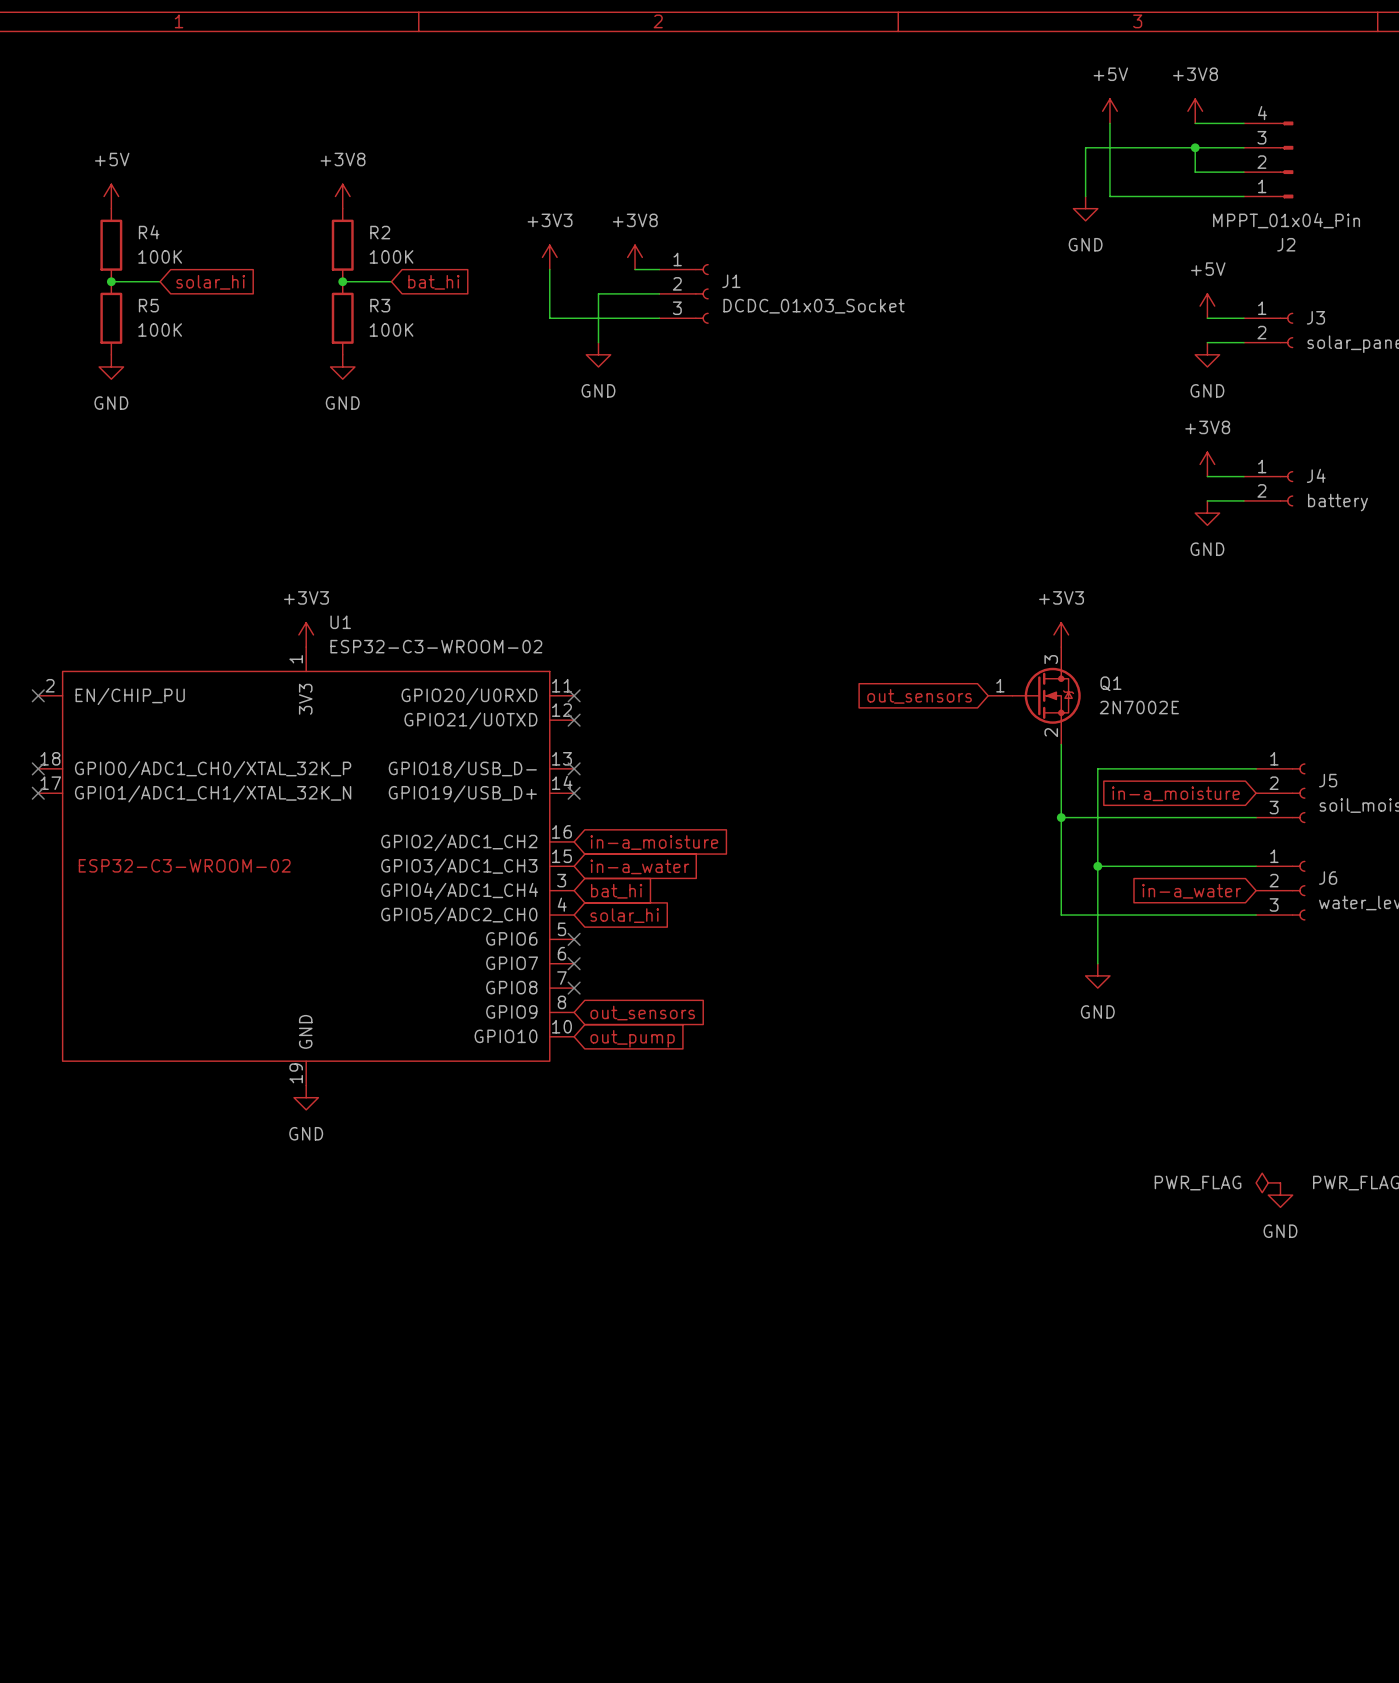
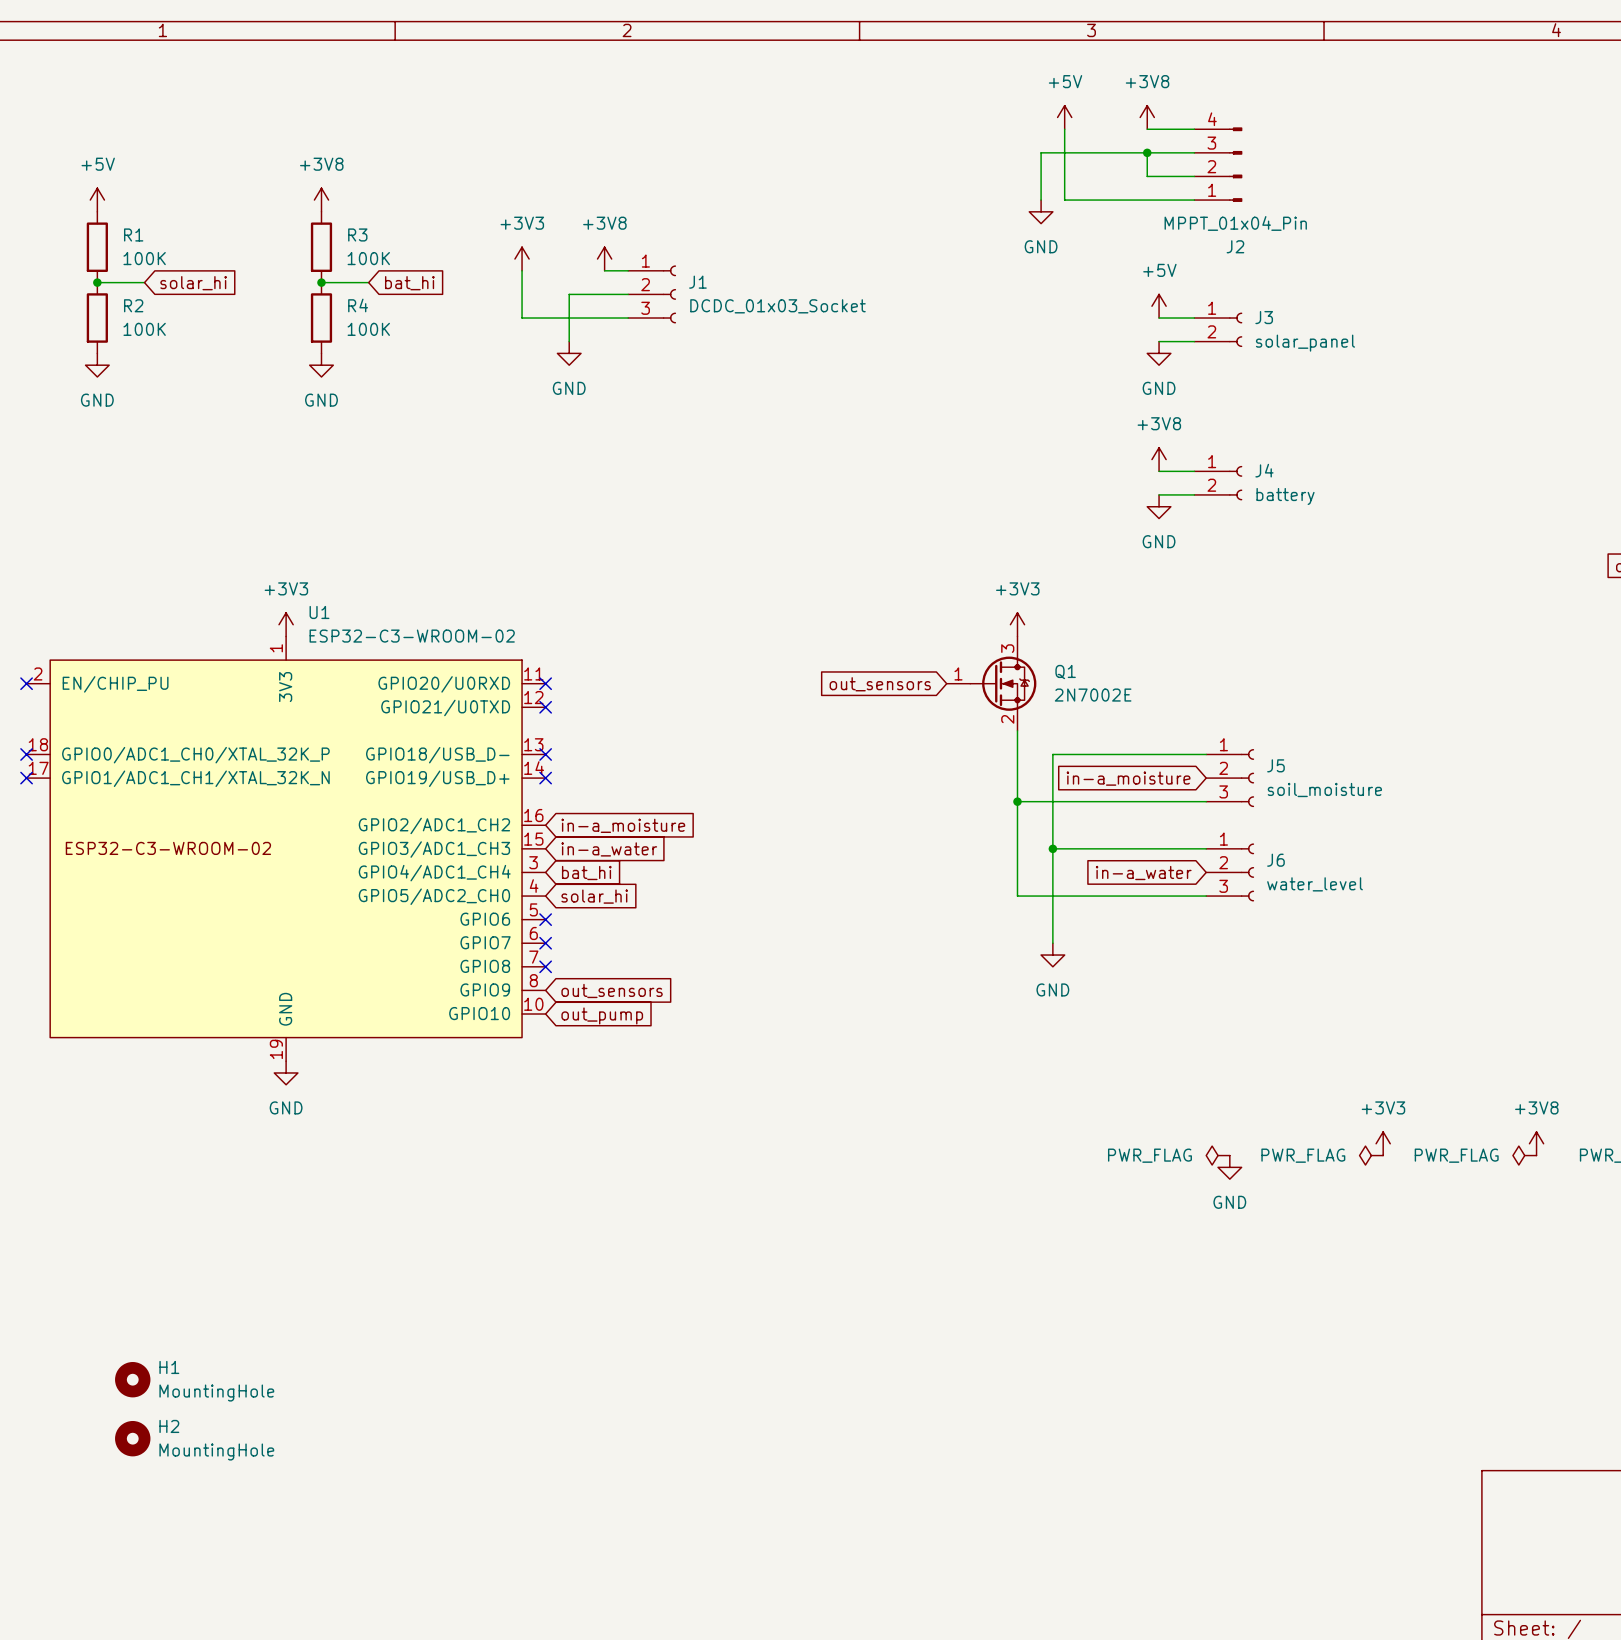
R4 name: R4 (149, 232) -> R1 (133, 234)
R2 name: R2 (380, 232) -> R3 (357, 234)
R5 name: R5 (148, 305) -> R2 (133, 305)
R3 name: R3 (380, 305) -> R4 (358, 305)
H1: none -> MountingHole (132, 1379)
H2: none -> MountingHole (132, 1438)

